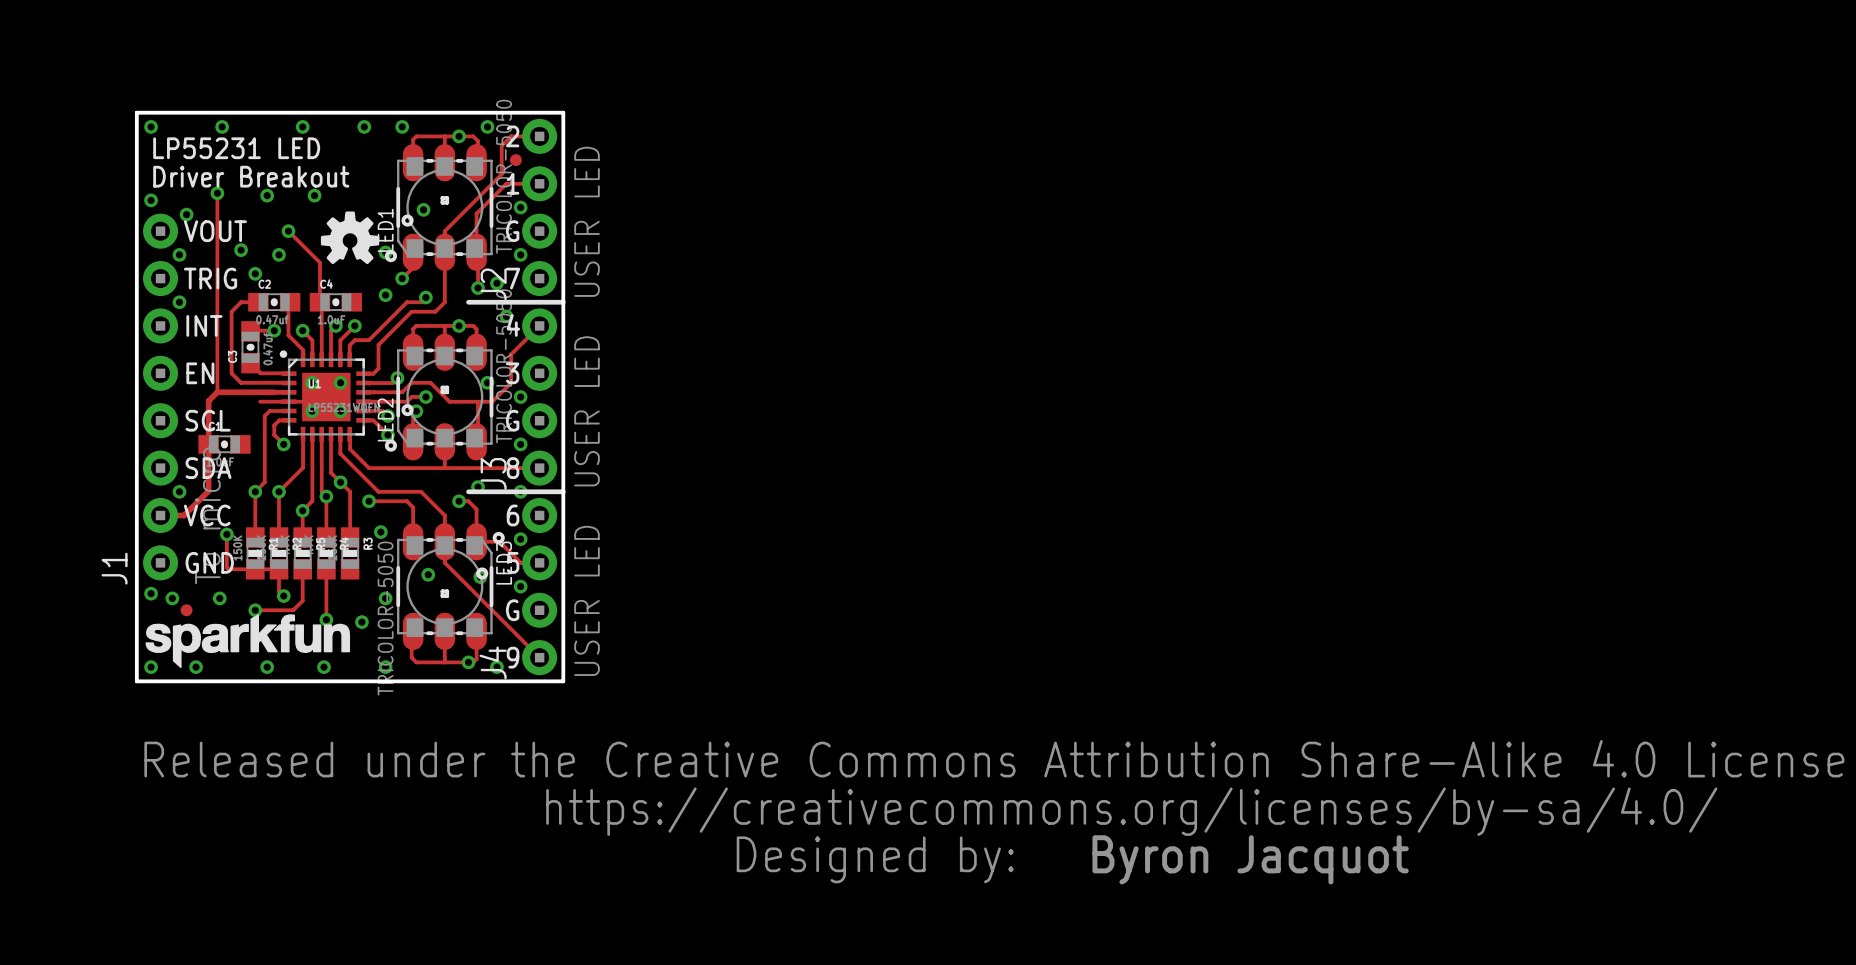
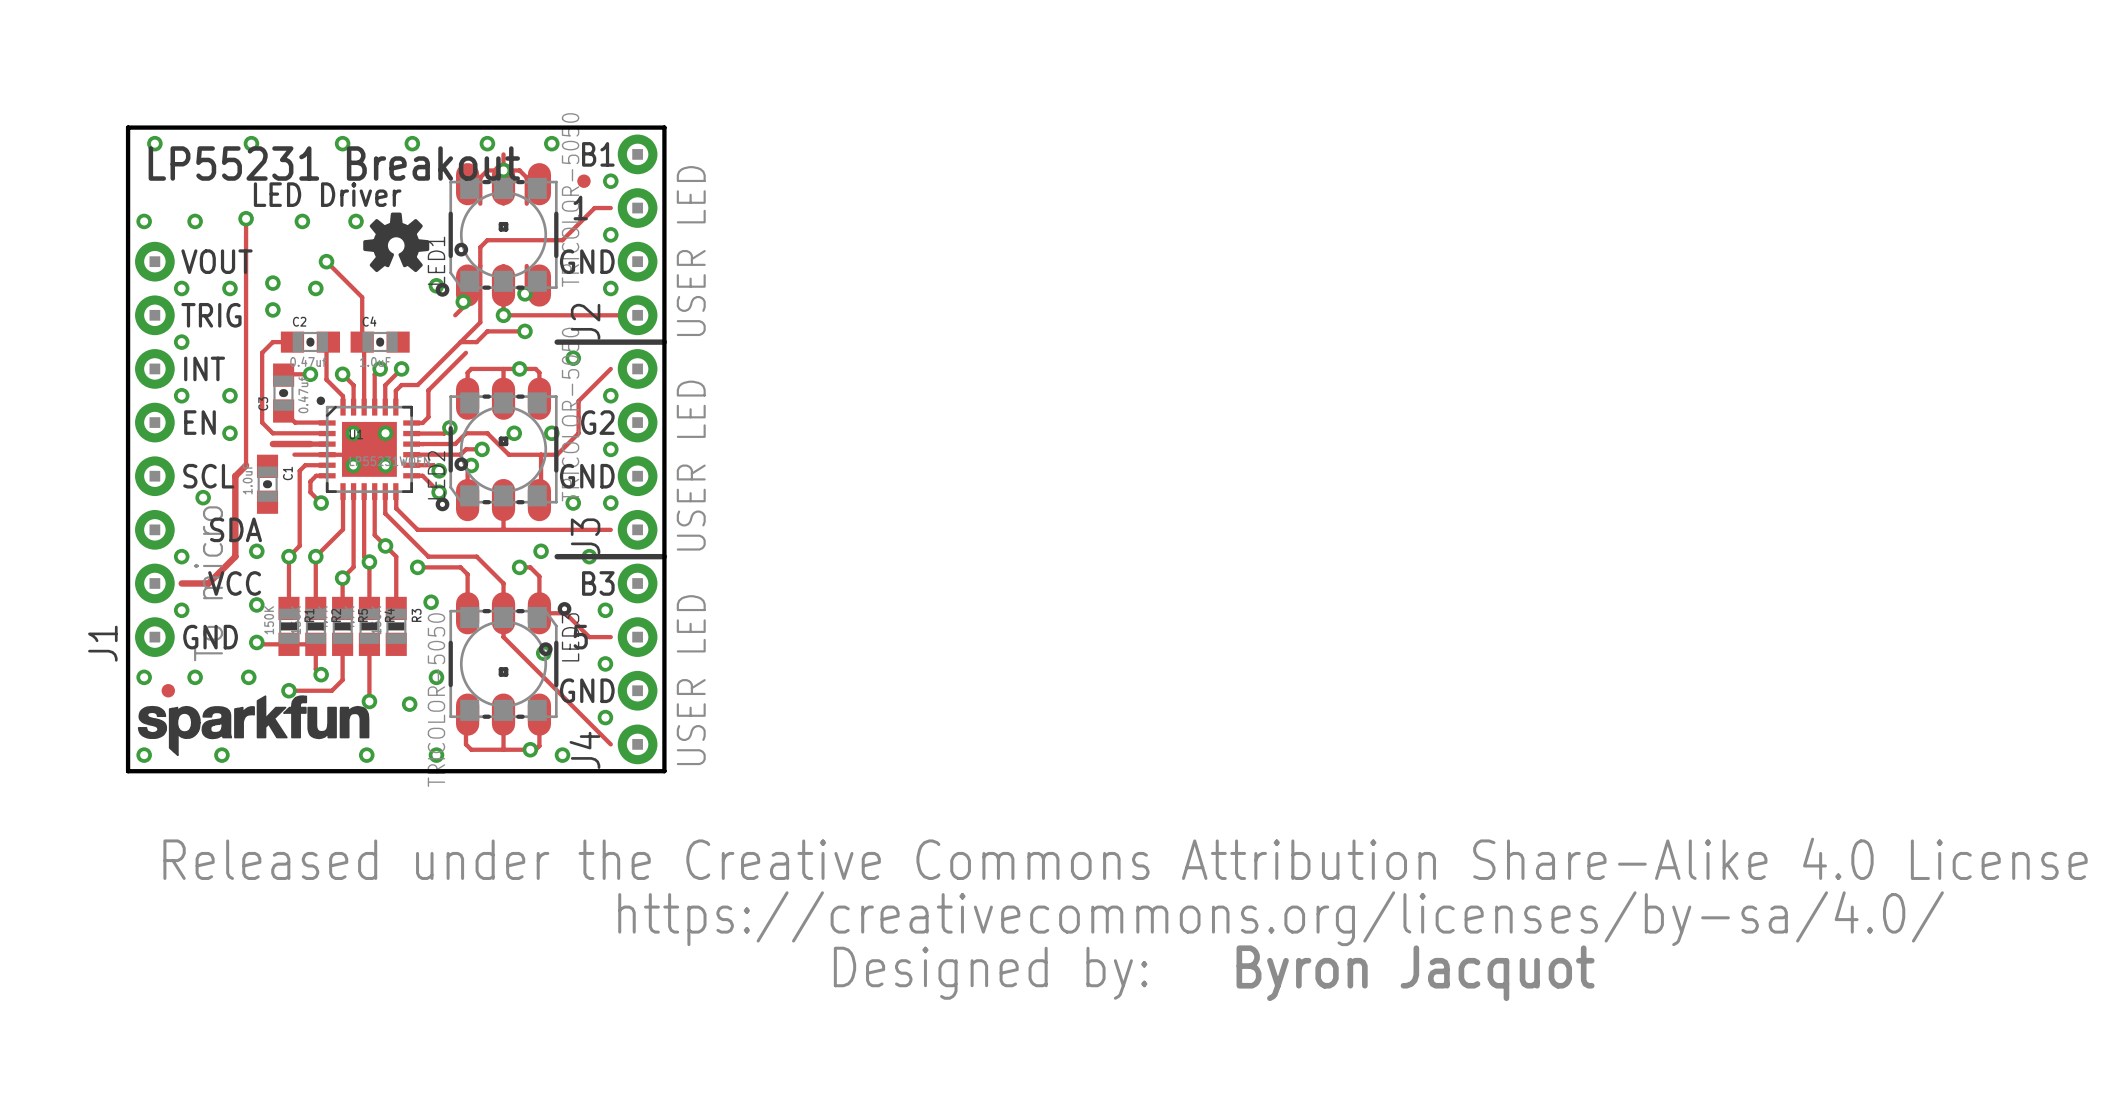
board edge: (136, 112) (136, 681) -> (154, 127) (128, 127) (128, 771) (154, 771)
board edge: (563, 112) (563, 681) -> (637, 127) (664, 127) (664, 771) (637, 771)
via position: (151, 126) -> (154, 143)
via: (402, 126) -> none
via: none -> (487, 143)
via: (459, 136) -> none
text: 2 (512, 136) -> none
text: none -> B1 (598, 154)
track: (539, 136) (511, 136) (501, 145) (501, 174) (444, 231) (444, 235) -> none
text: none -> LP55231 Breakout (334, 163)
text: LP55231 LED (236, 148) -> none
via: none -> (503, 170)
via: none -> (610, 181)
track: (413, 162) (413, 139) (416, 136) (473, 136) (478, 141) (476, 162) -> none
text: none -> LED Driver (327, 194)
text: Driver Breakout (251, 176) -> none
track: none -> (480, 203) (480, 177) (487, 170) (519, 170) (526, 177) (526, 203)
track: (525, 183) (506, 183) (476, 213) (478, 288) -> (594, 208) (562, 240) (487, 240) (480, 247) (480, 322) (460, 342)
via: none -> (144, 221)
via: none -> (195, 221)
via: (151, 200) -> none
via position: (520, 207) -> (610, 234)
J2 position: (539, 207) -> (637, 234)
via: (423, 209) -> none
via: (186, 214) -> none
text position: VOUT (215, 231) -> VOUT (217, 261)
text: G (512, 231) -> none
text: none -> GND (587, 261)
track: none -> (526, 265) (526, 292) (524, 293)
drawing position: (350, 237) -> (396, 242)
via: none -> (181, 288)
via: (179, 254) -> none
via: none -> (229, 288)
via position: (520, 254) -> (610, 288)
via: none -> (524, 293)
via position: (255, 273) -> (272, 309)
text position: TRIG (210, 278) -> TRIG (211, 315)
via position: (402, 278) -> (463, 301)
track: (444, 278) (444, 302) (435, 311) (411, 311) -> (503, 315) (637, 315)
via: none -> (503, 315)
text: 7 (513, 278) -> none
via: (496, 283) -> none
via position: (478, 288) -> (524, 331)
track: none -> (524, 331) (487, 331) (482, 336)
via: (385, 295) -> none
via: (425, 297) -> none
via position: (179, 302) -> (181, 342)
line: (468, 302) (492, 302) -> (637, 342) (664, 342)
text position: INT (204, 325) -> INT (204, 368)
text: 4 (513, 325) -> none
via: none -> (181, 395)
via: none -> (229, 395)
via: none -> (610, 395)
text position: EN (200, 373) -> EN (199, 422)
text: 3 (512, 373) -> none
text: none -> G2 (597, 422)
via: none -> (229, 433)
via: none -> (514, 433)
track: (241, 392) (217, 392) (208, 401) (207, 491) -> (246, 444) (246, 465) (235, 476) (235, 556)
J1 position: (160, 397) -> (154, 449)
via position: (520, 397) -> (610, 449)
J3 position: (539, 397) -> (637, 449)
text position: SCL (208, 420) -> SCL (208, 476)
text: G (512, 420) -> none
text: none -> GND (587, 476)
via: none -> (203, 497)
C1 rotation: 0° (224, 444) -> 90° clockwise (267, 484)
via: none -> (573, 503)
via: (520, 444) -> none
via: none -> (610, 503)
text: 8 (513, 468) -> none
via: none -> (256, 551)
via position: (179, 491) -> (181, 556)
line: (468, 491) (492, 491) -> (637, 556) (664, 556)
text: 6 (513, 515) -> none
text: none -> B3 (598, 583)
track: (226, 534) (226, 567) -> none
via: none -> (181, 610)
via position: (520, 539) -> (605, 610)
text position: GND (209, 562) -> GND (210, 637)
via: none -> (256, 642)
via: (428, 574) -> none
via position: (520, 586) -> (605, 663)
J4 position: (539, 586) -> (637, 663)
via position: (151, 593) -> (144, 677)
part position: (186, 610) -> (168, 690)
text: G (512, 610) -> none
text: none -> GND (587, 690)
via: none -> (605, 717)
drawing position: (247, 641) -> (253, 725)
text: 9 (513, 657) -> none
via position: (151, 667) -> (144, 755)
via: (267, 667) -> none

